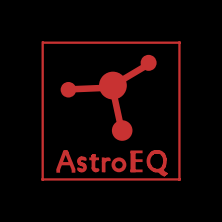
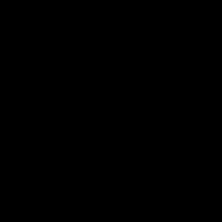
part: (111, 111) -> none

